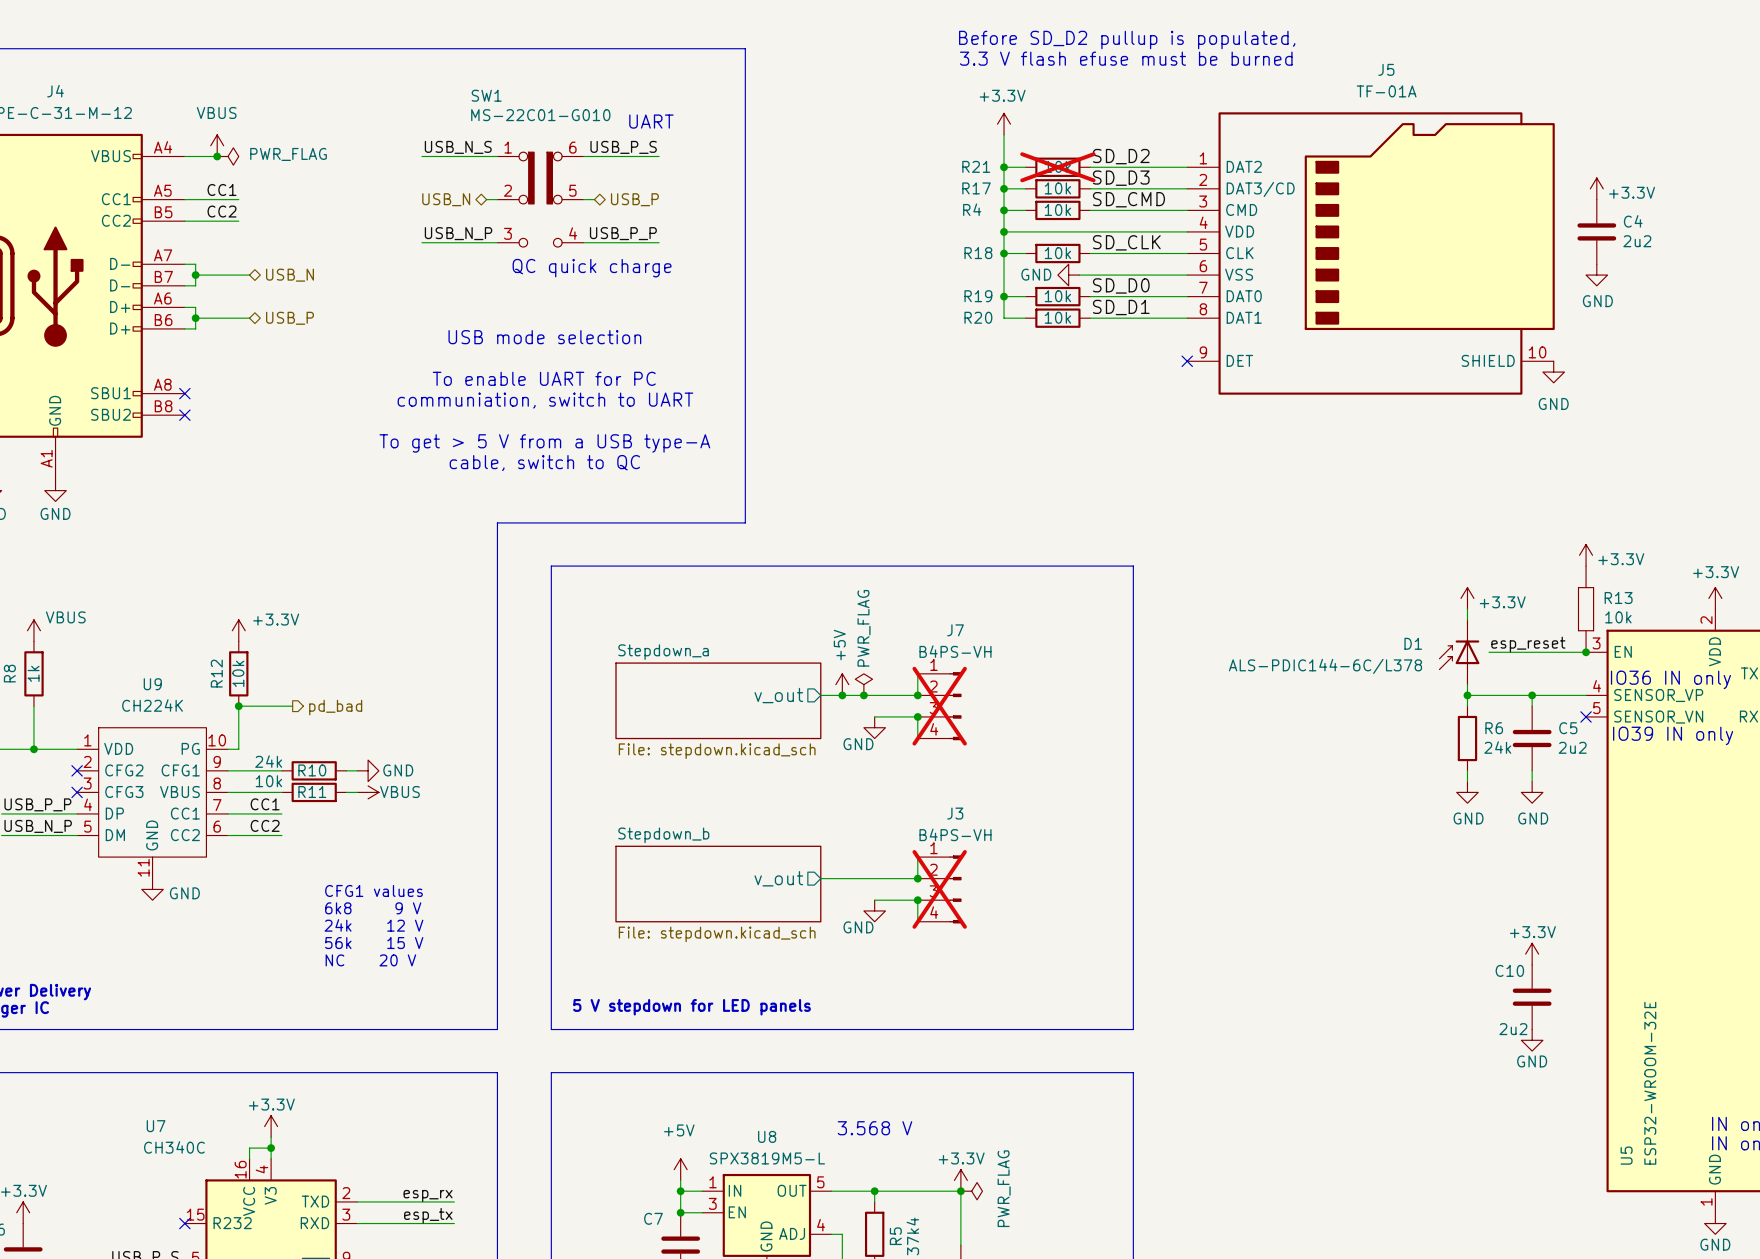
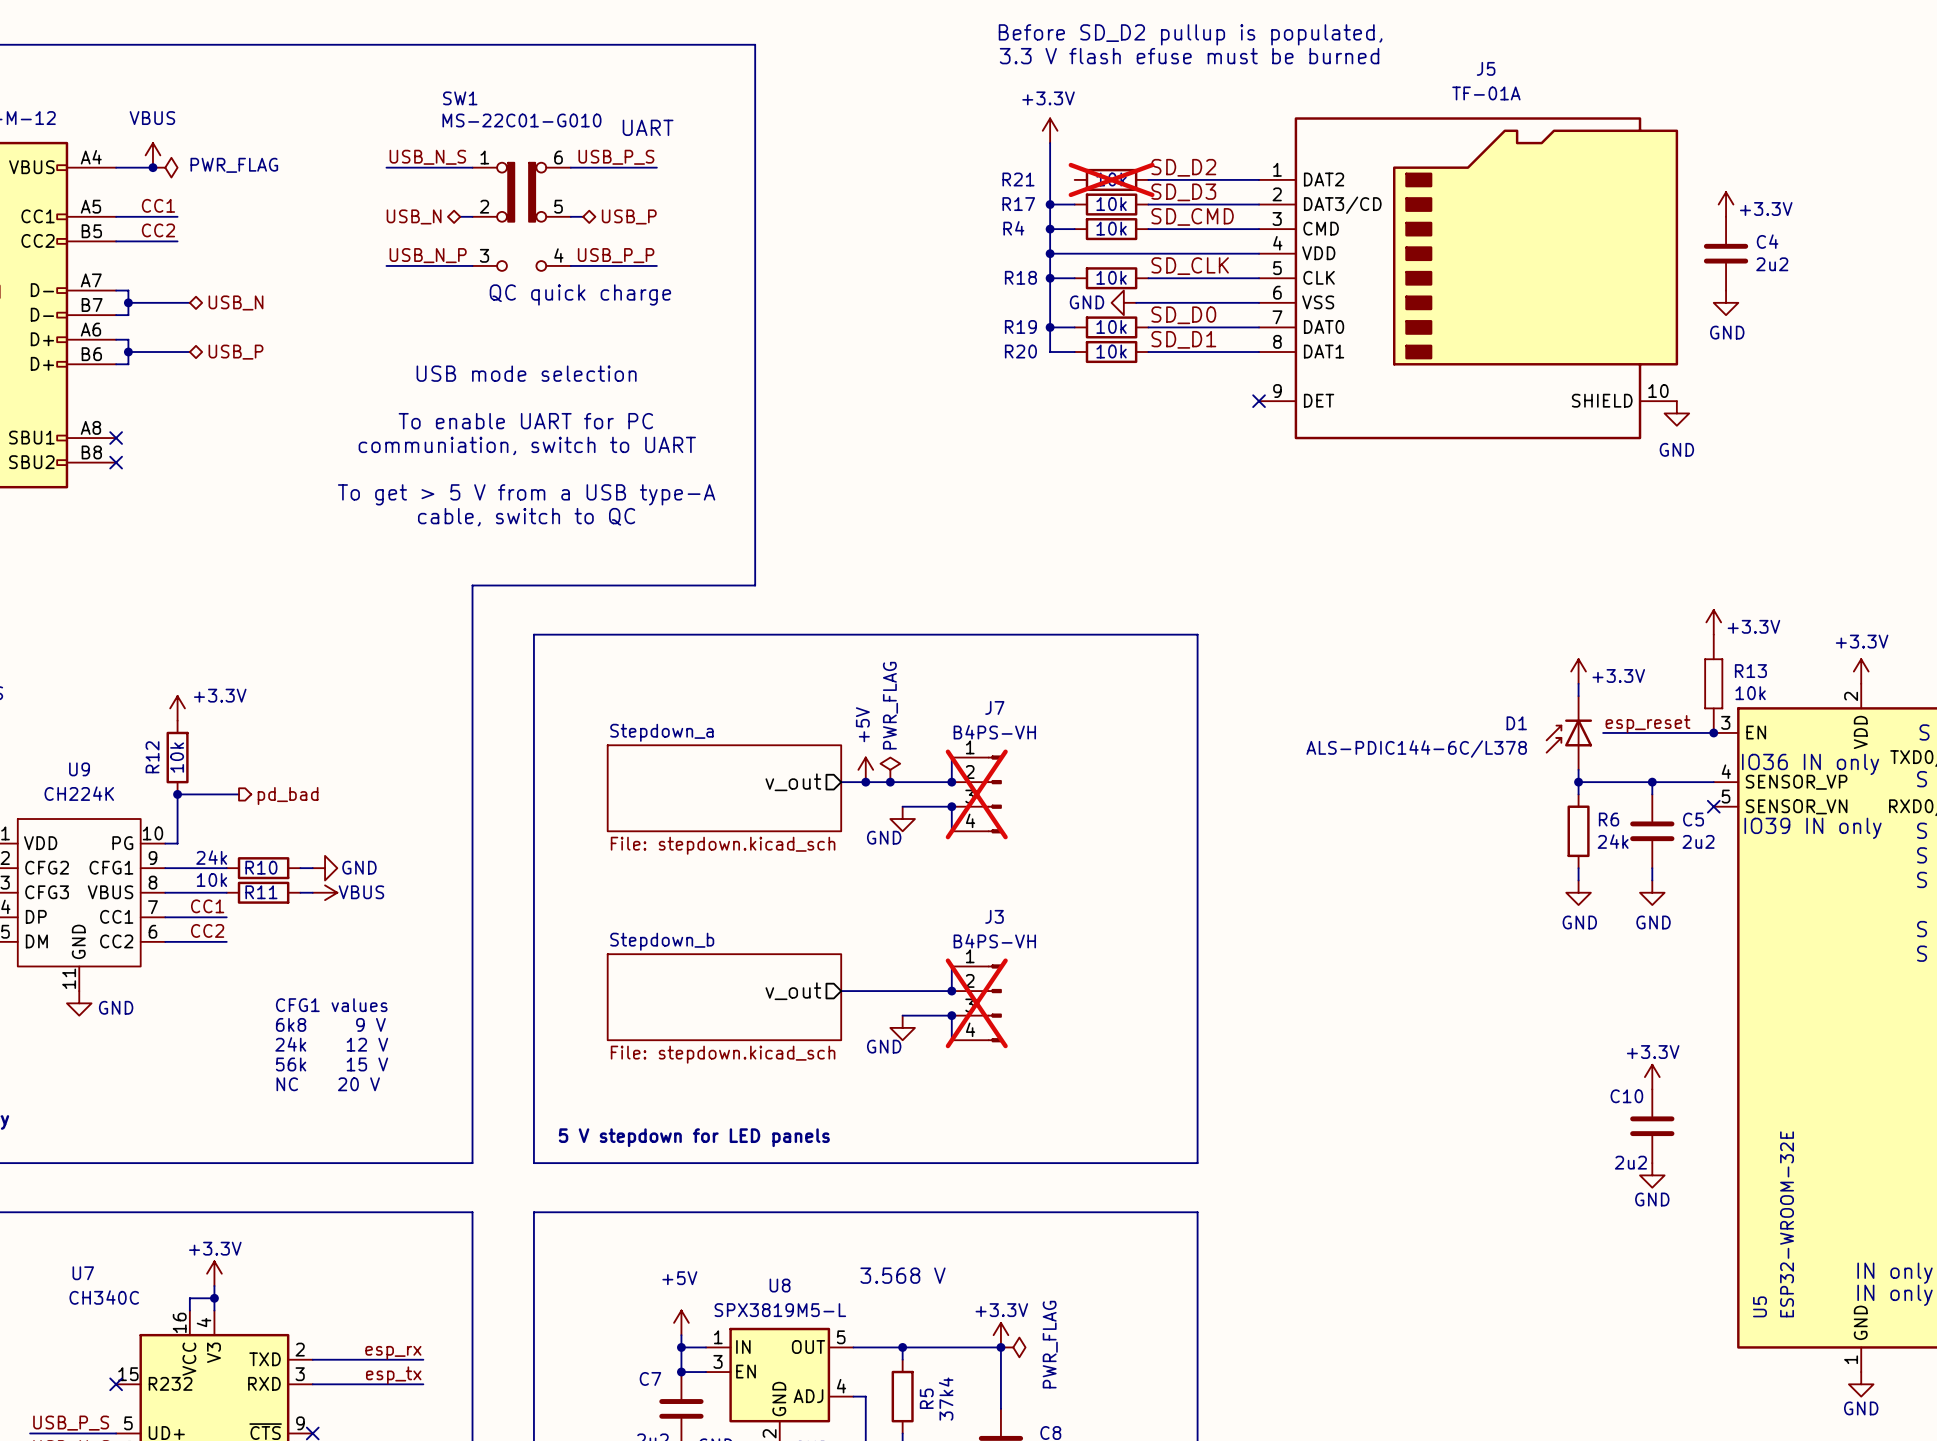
wire: (1004, 167) (1025, 167) -> none
junction: (1004, 167) -> none

